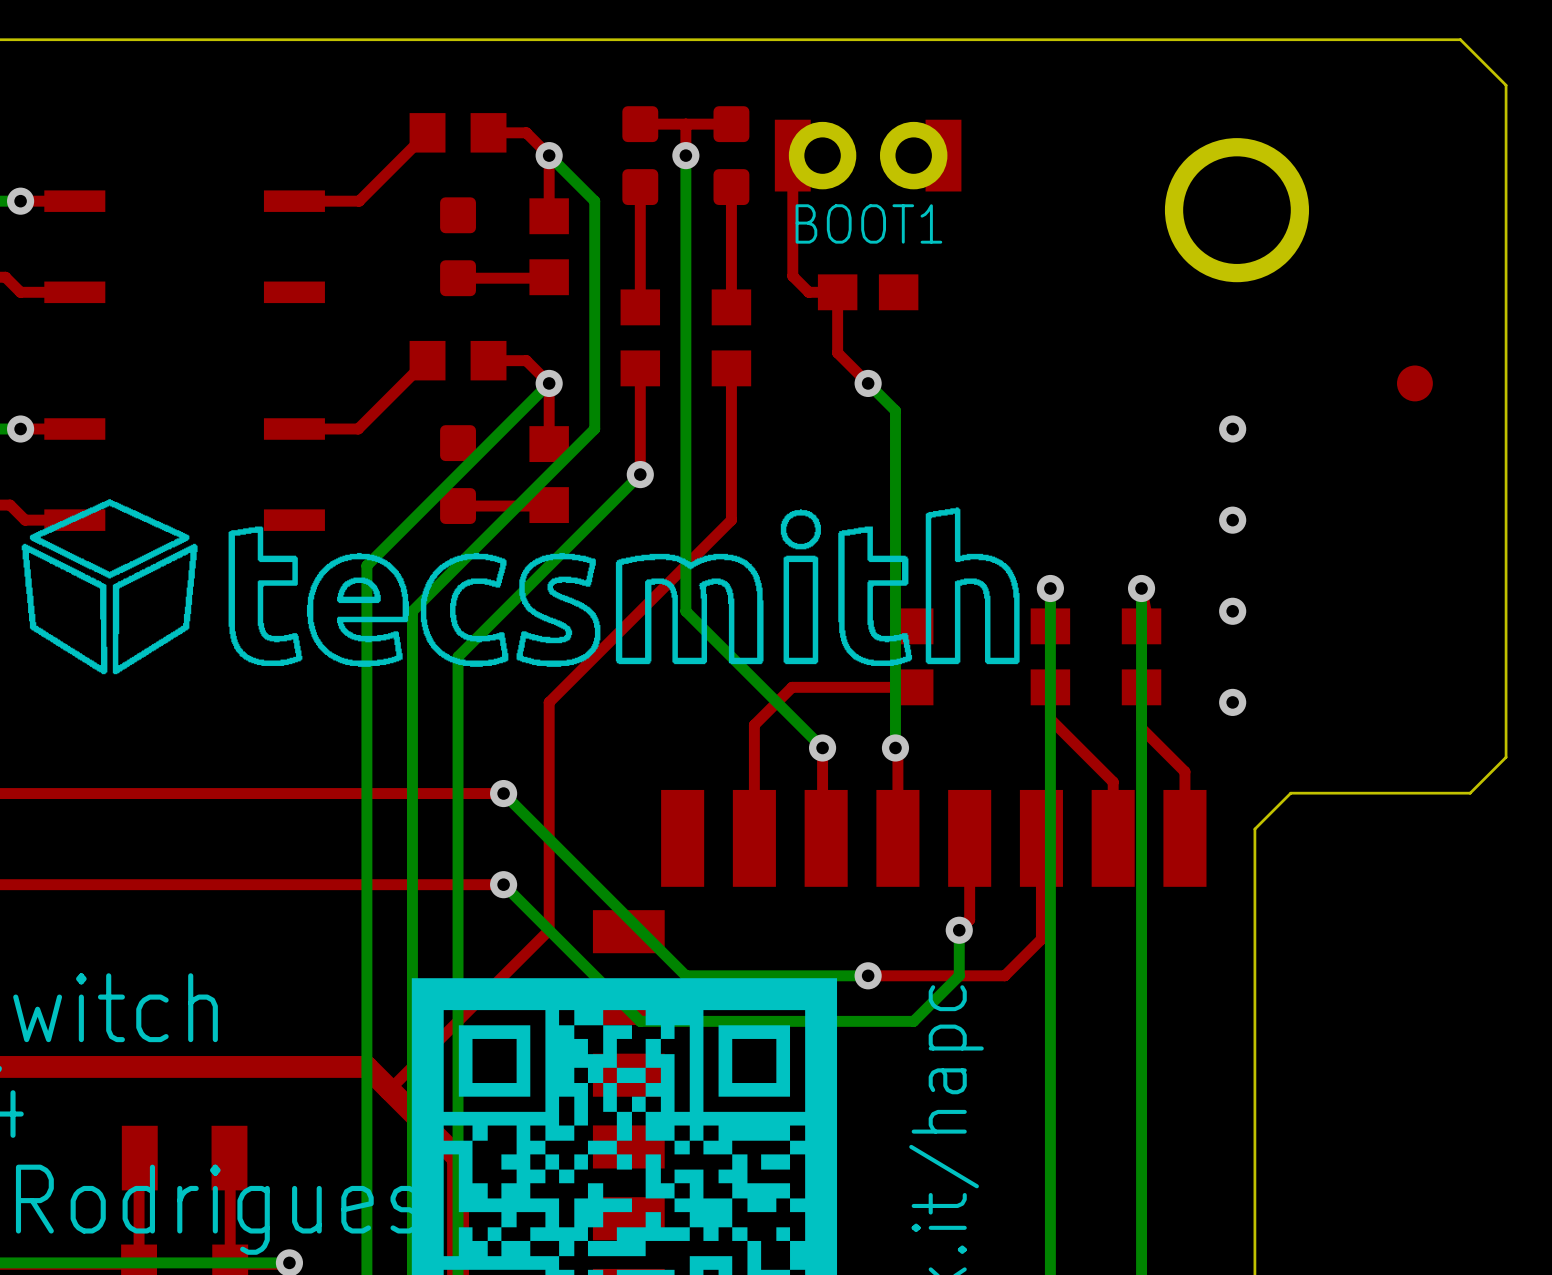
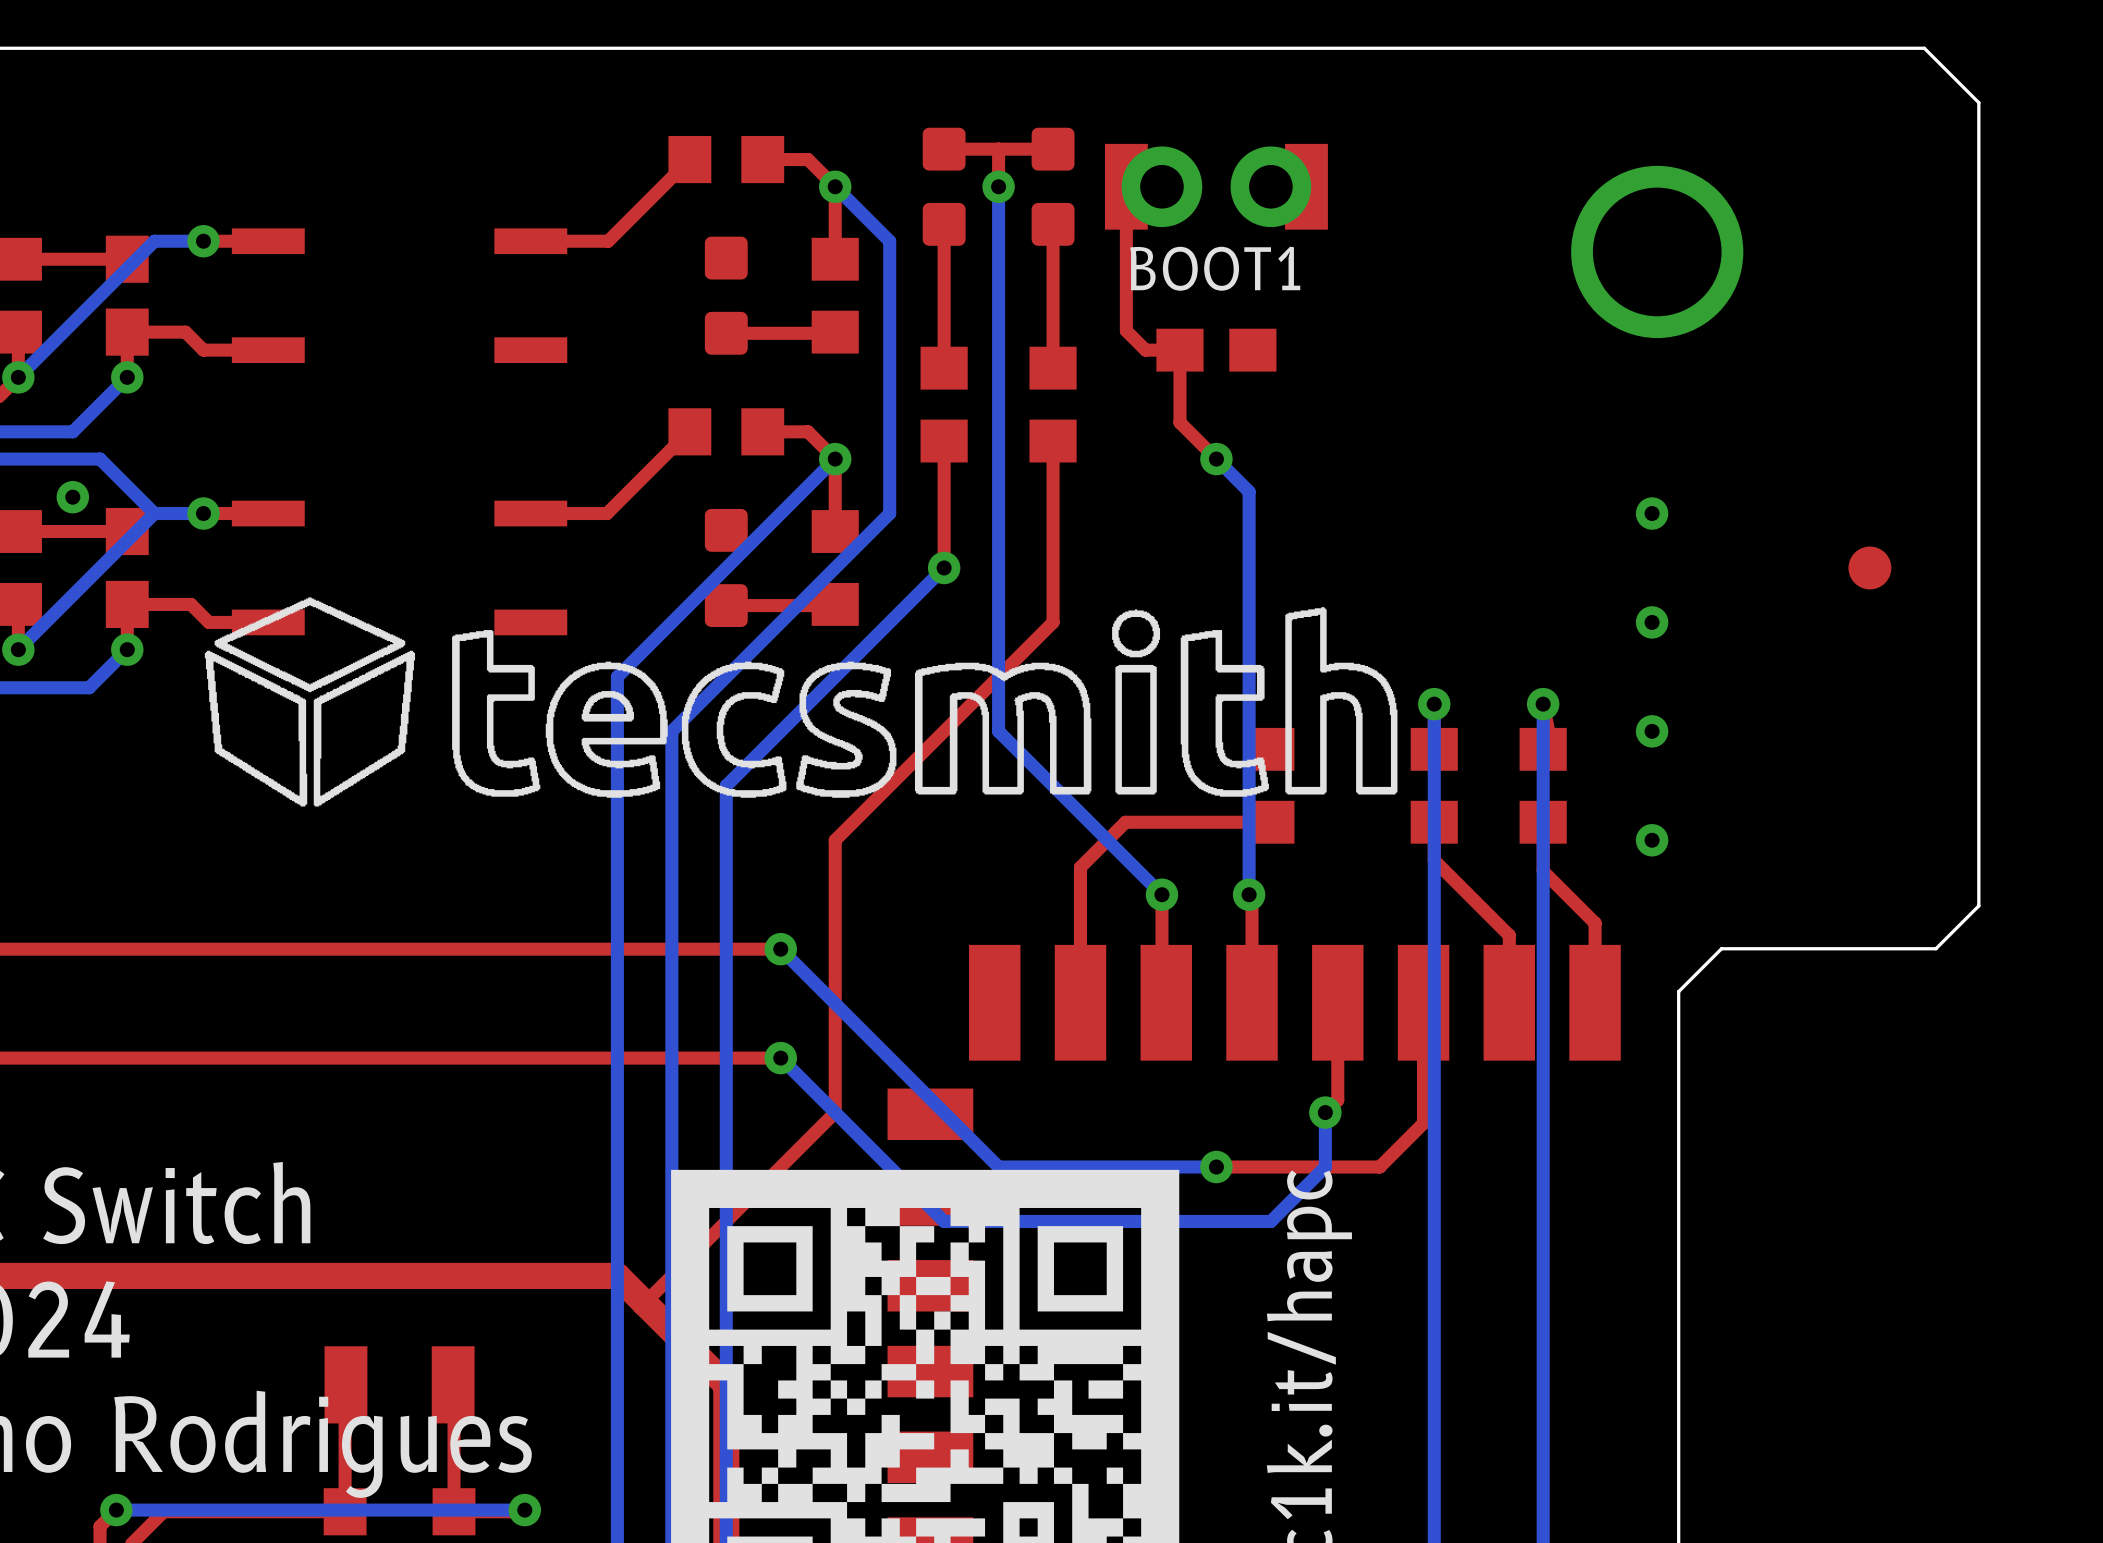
part position: (1414, 383) -> (1869, 567)

